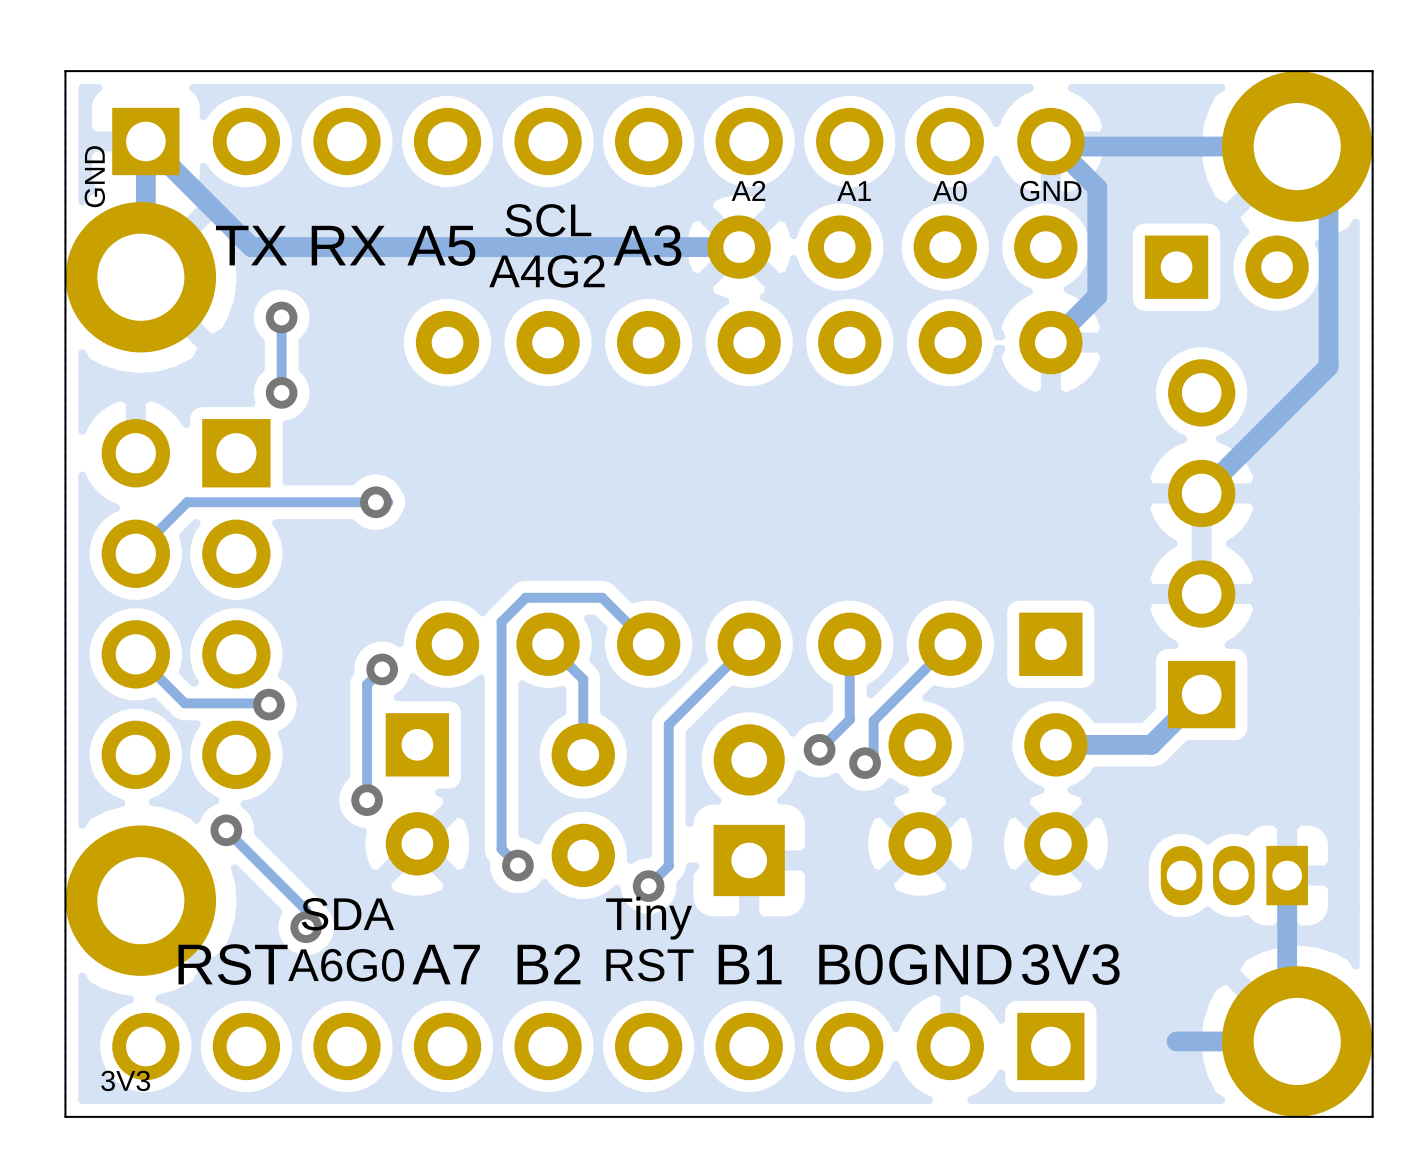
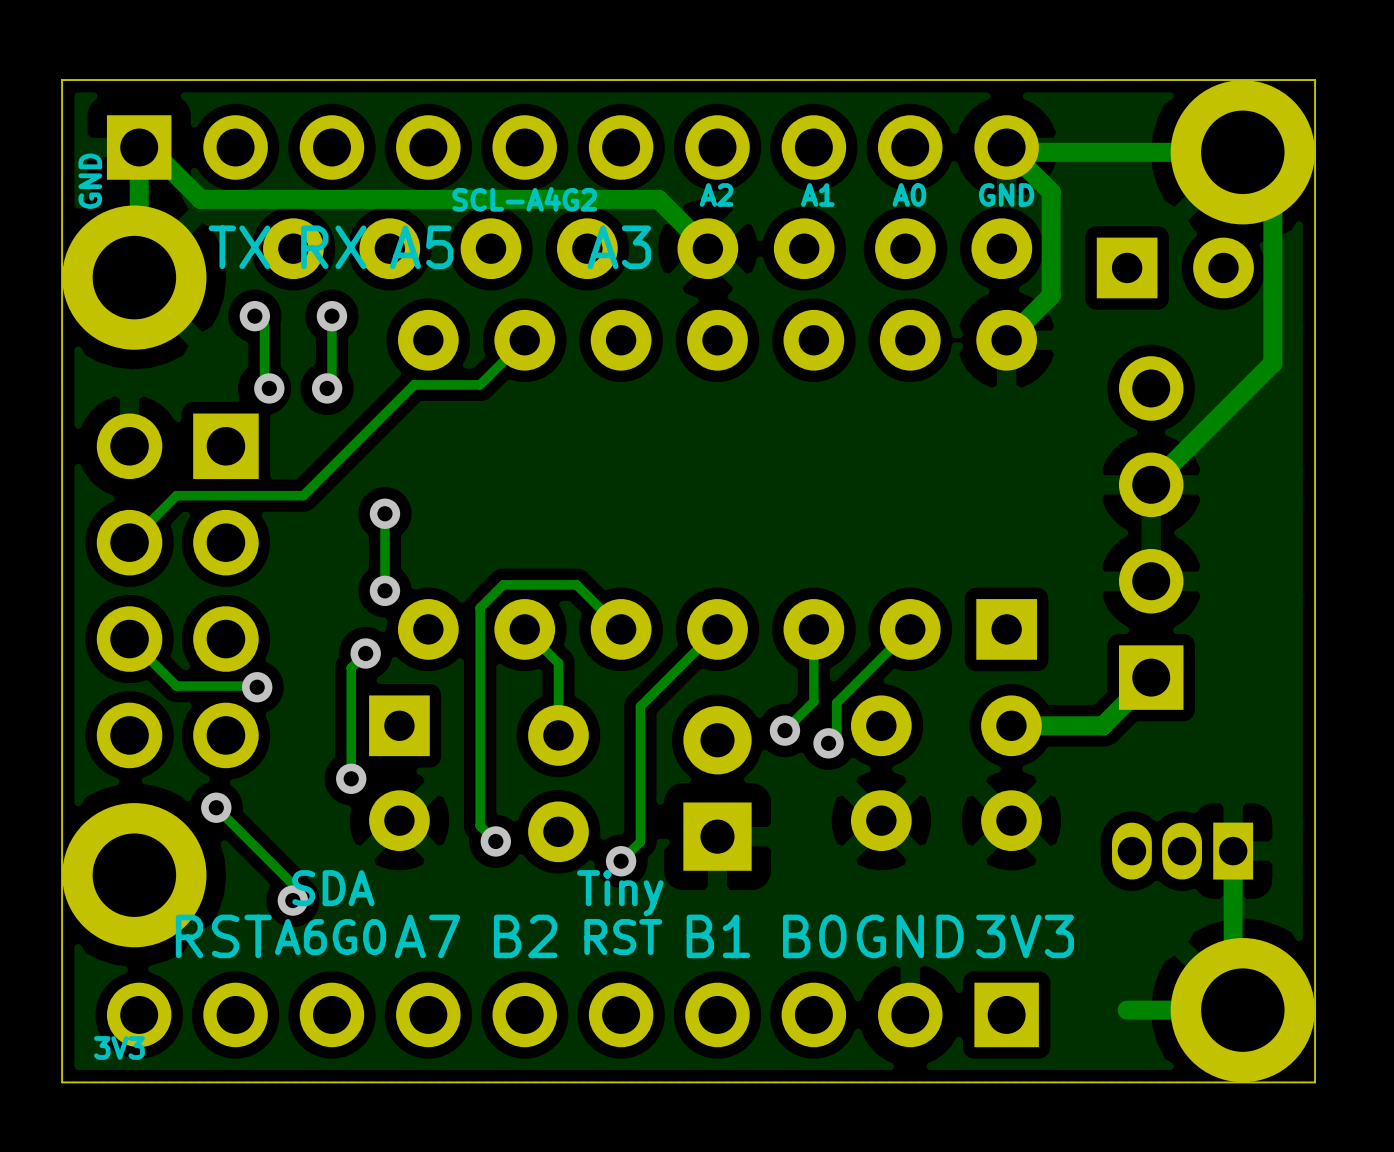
track: (145, 141) (251, 247) (739, 247) -> (139, 147) (148, 147) (200, 199) (658, 199) (707, 248)
text: SCL (548, 220) -> SCL-A4G2 (524, 199)
part: none -> (341, 248)
part: none -> (539, 248)
text: A4G2 (546, 271) -> none
track: none -> (254, 316) (264, 325) (264, 388)
track: (281, 317) (281, 392) -> none
via position: (281, 317) -> (254, 316)
track: none -> (331, 316) (331, 393)
via: none -> (331, 316)
via: none -> (327, 388)
via position: (375, 502) -> (384, 513)
track: (388, 502) (187, 502) (184, 504) -> (524, 340) (480, 384) (414, 384) (303, 495) (176, 495)
track: none -> (384, 513) (384, 590)
via: none -> (384, 590)

